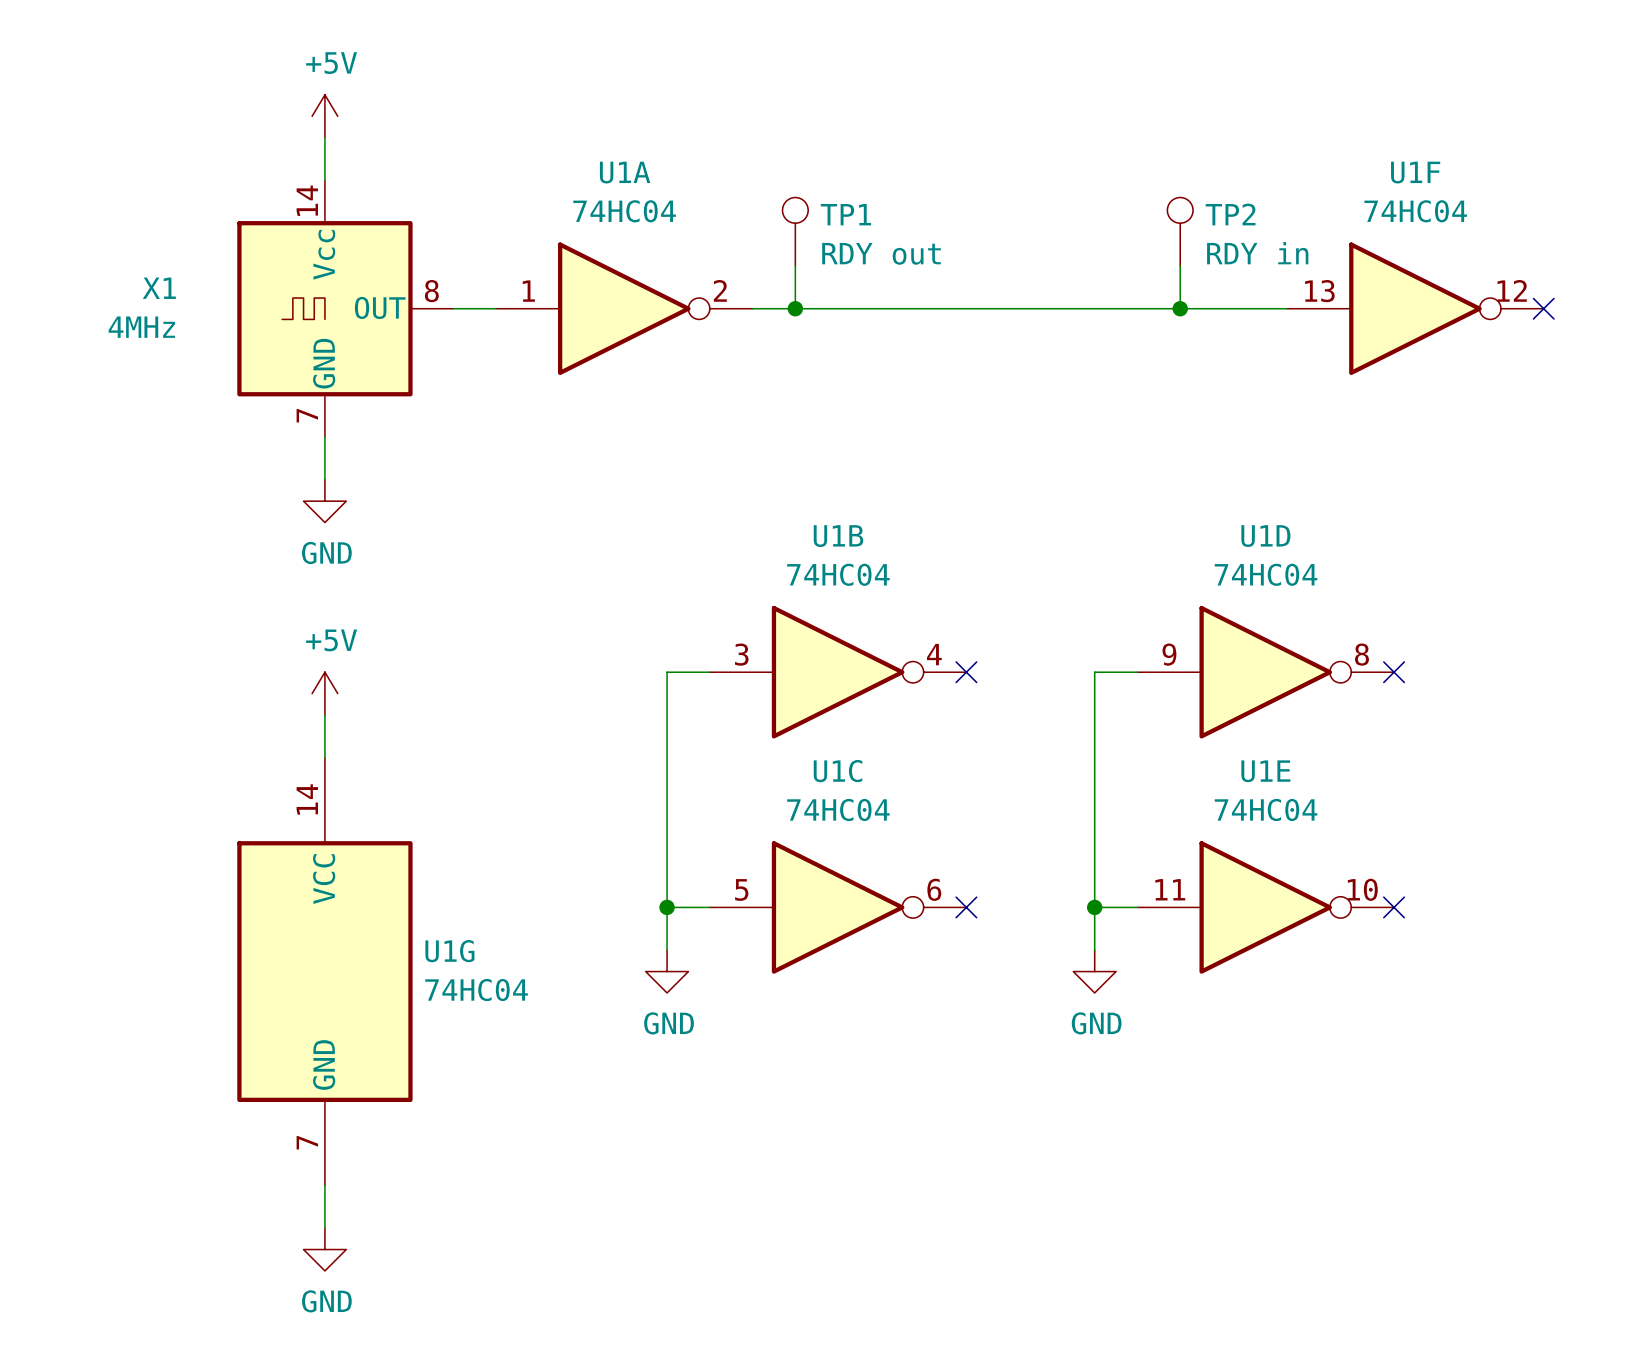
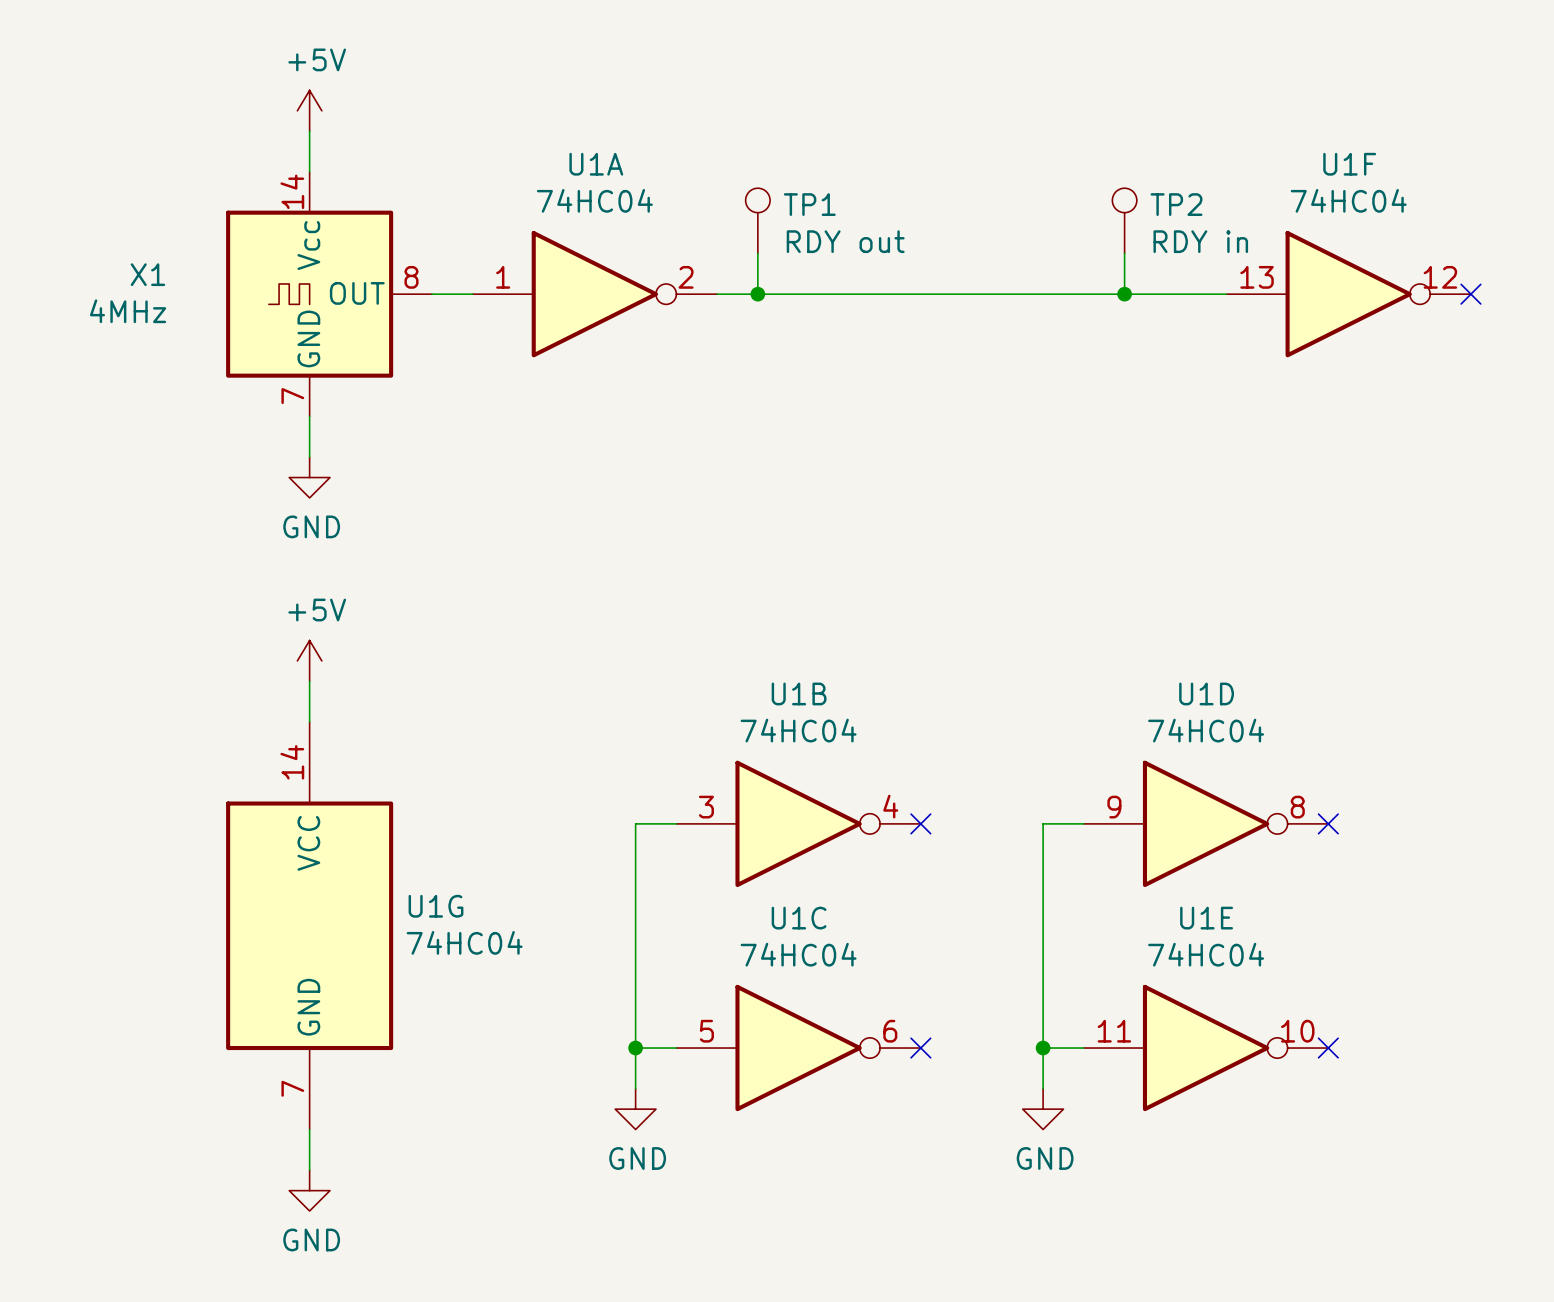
wire: (709, 672) (667, 672) (667, 864) -> (676, 823) (635, 823)
U1B position: (838, 672) -> (798, 823)
no-connect mark: (966, 672) -> none
wire: (1137, 672) (1094, 672) (1094, 864) -> (1083, 823) (1043, 823)
U1D position: (1265, 672) -> (1206, 823)
no-connect mark: (1394, 672) -> none
wire: (667, 907) (709, 907) -> (635, 1048) (676, 1048)
junction: (667, 907) -> none
U1C position: (838, 907) -> (798, 1048)
no-connect mark position: (966, 907) -> (920, 823)
wire: (1094, 907) (1137, 907) -> (1043, 1048) (1083, 1048)
junction: (1094, 907) -> none
U1E position: (1265, 907) -> (1206, 1048)
no-connect mark position: (1394, 907) -> (1328, 823)
wire: none -> (635, 905) (635, 1088)
wire: none -> (1043, 905) (1043, 1088)
power symbol position: GND (667, 971) -> GND (635, 1109)
power symbol position: GND (1094, 971) -> GND (1043, 1109)
junction: none -> (635, 1048)
no-connect mark: none -> (920, 1048)
junction: none -> (1043, 1048)
no-connect mark: none -> (1328, 1048)

